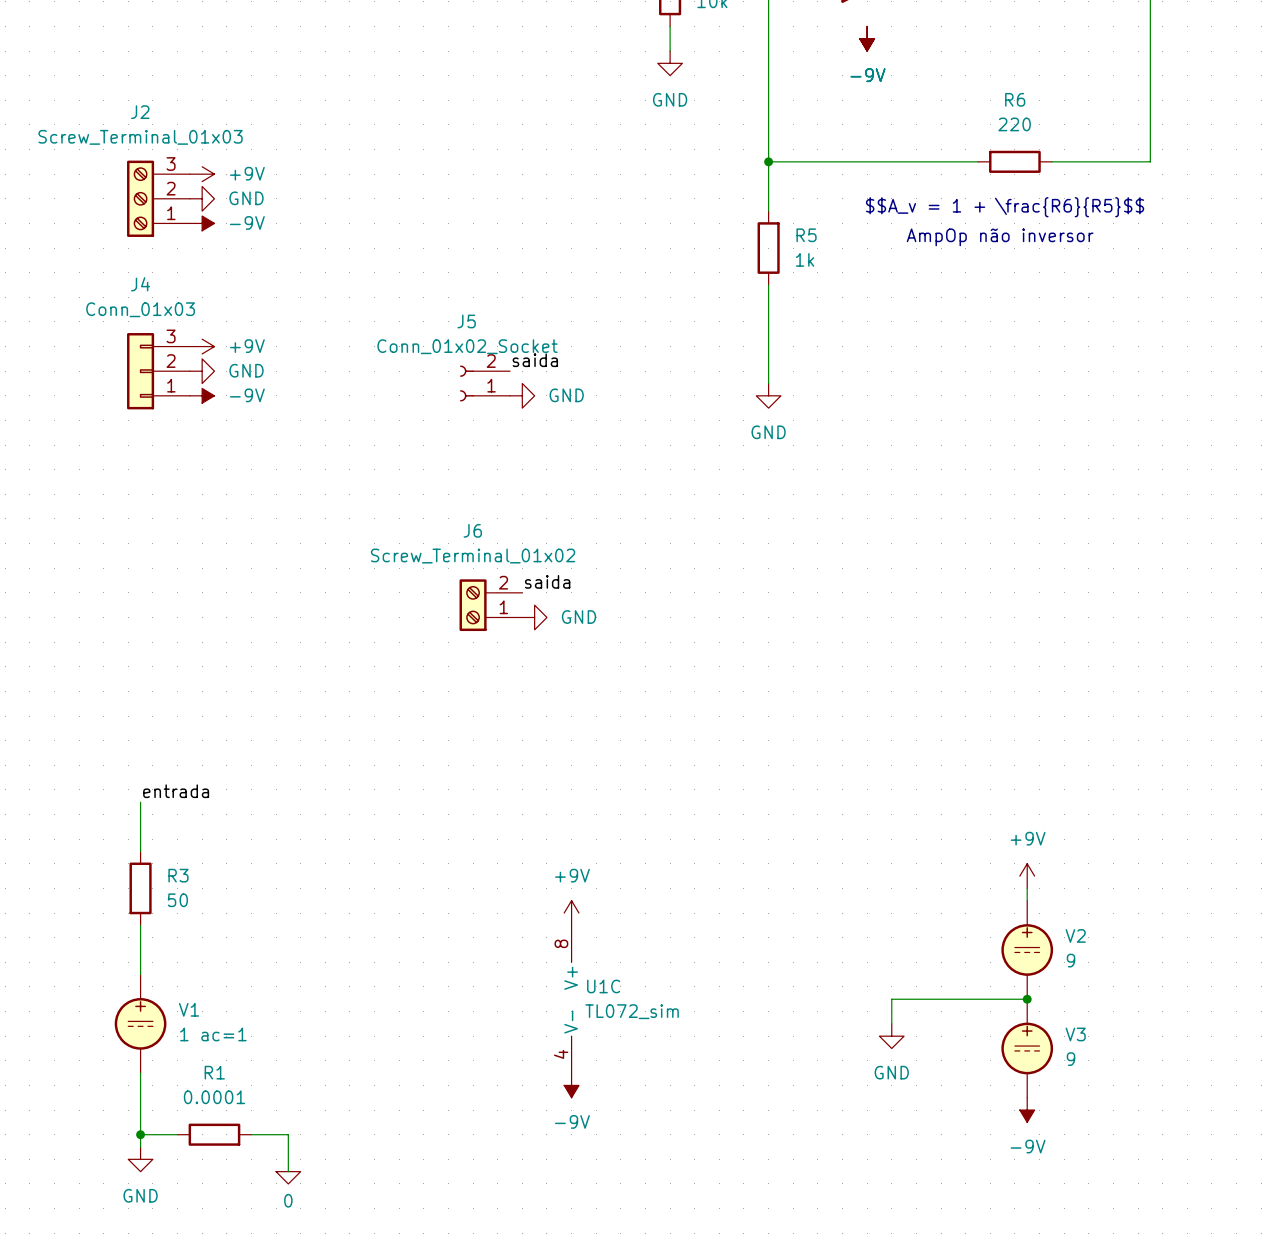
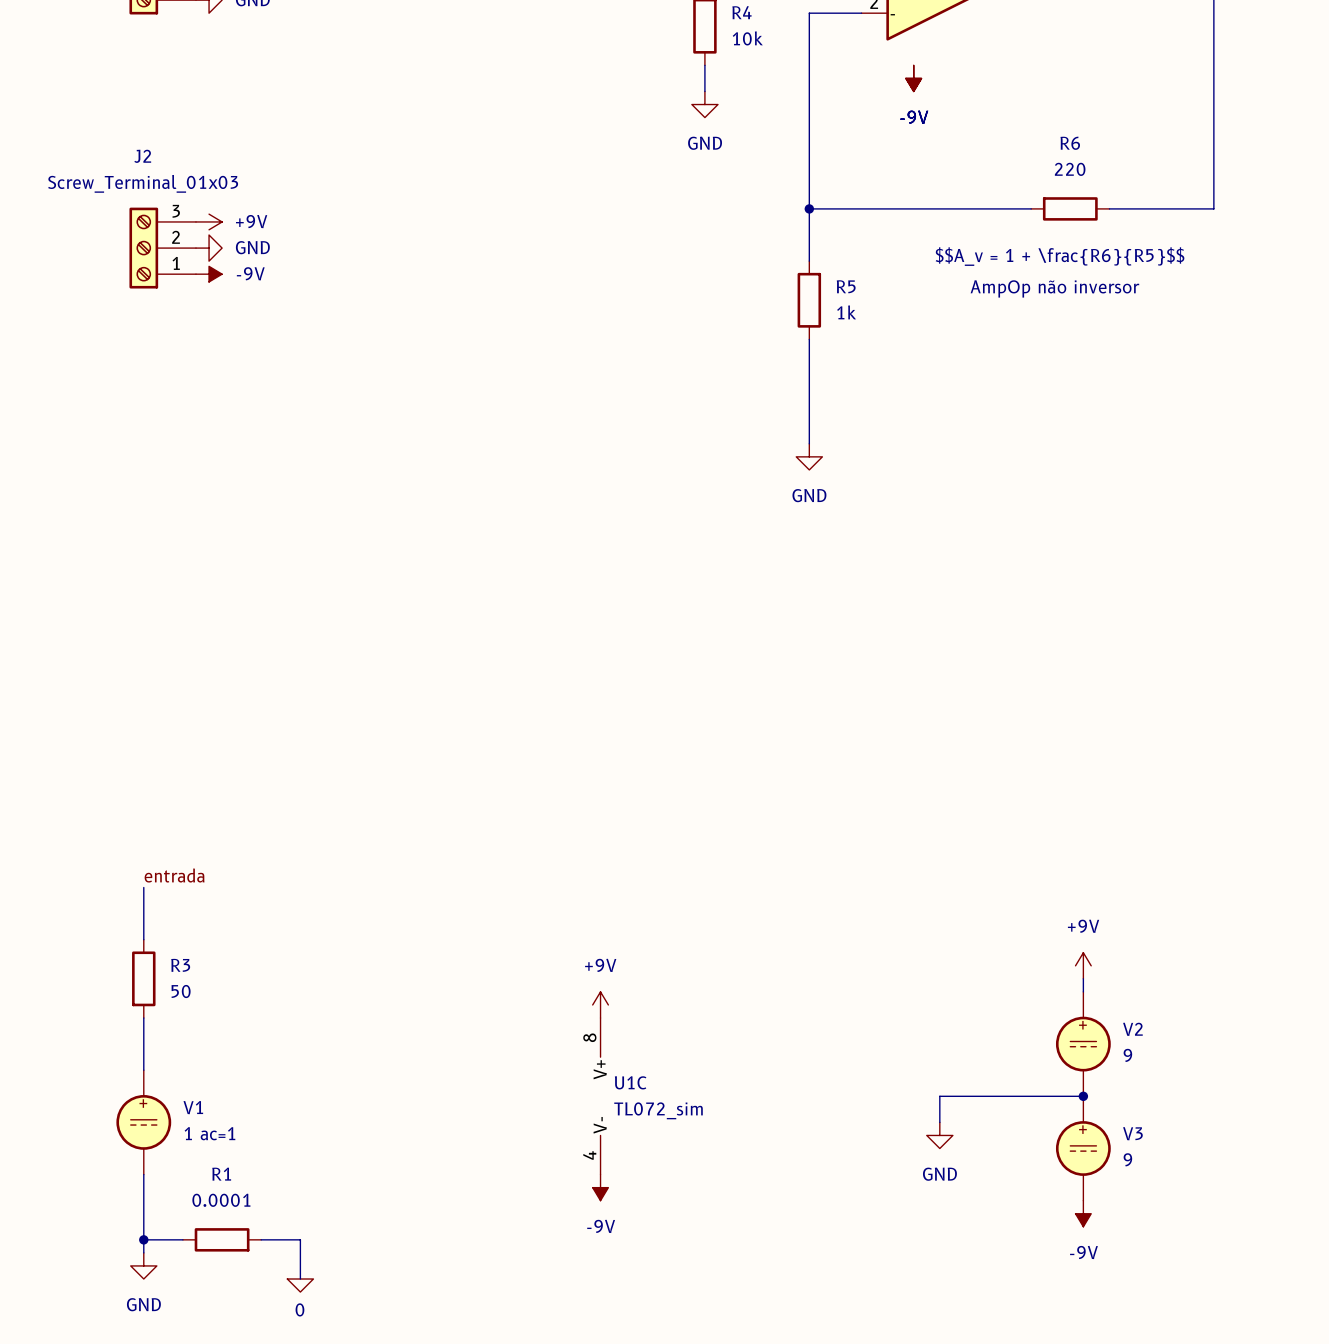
power symbol: +9V (202, 346) -> none
label: saida (535, 360) -> none
J4: Conn_01x03 (158, 371) -> none
power symbol: GND (202, 371) -> none
J5: Conn_01x02_Socket (485, 383) -> none
power symbol: -9V (202, 395) -> none
power symbol: GND (522, 395) -> none
label: saida (547, 581) -> none
J6: Screw_Terminal_01x02 (490, 605) -> none
power symbol: GND (534, 617) -> none

